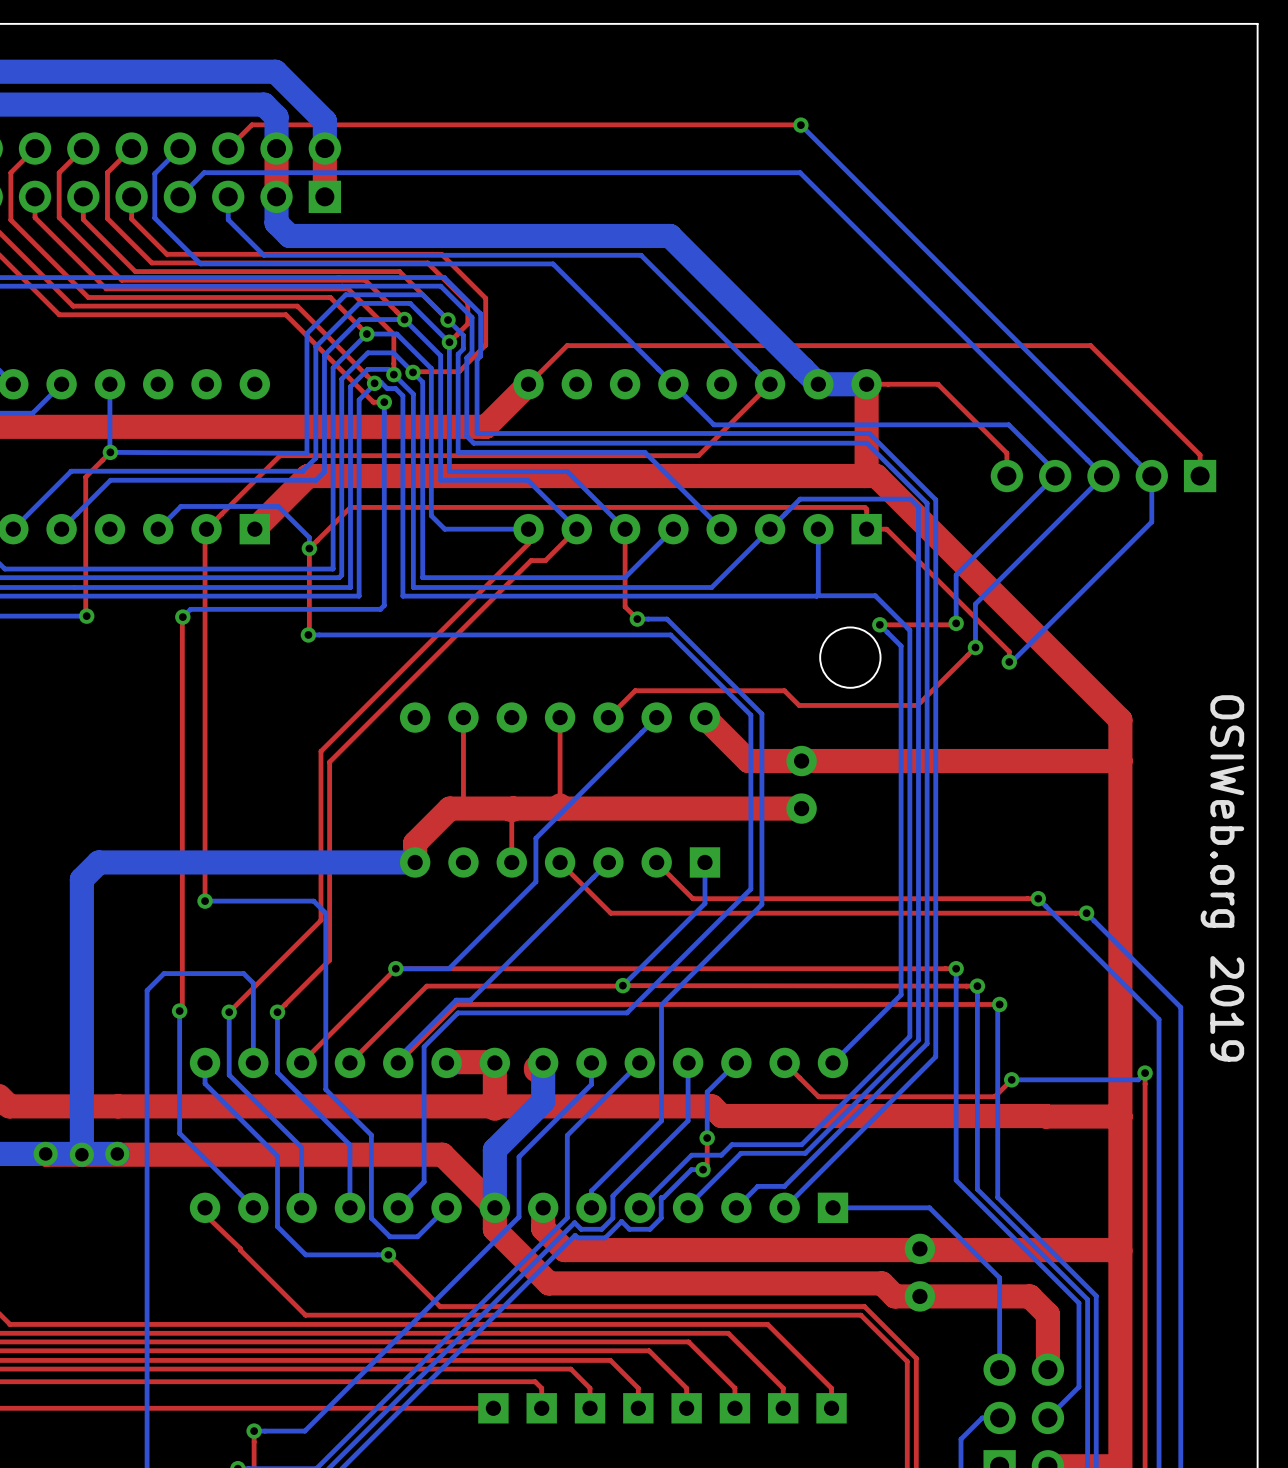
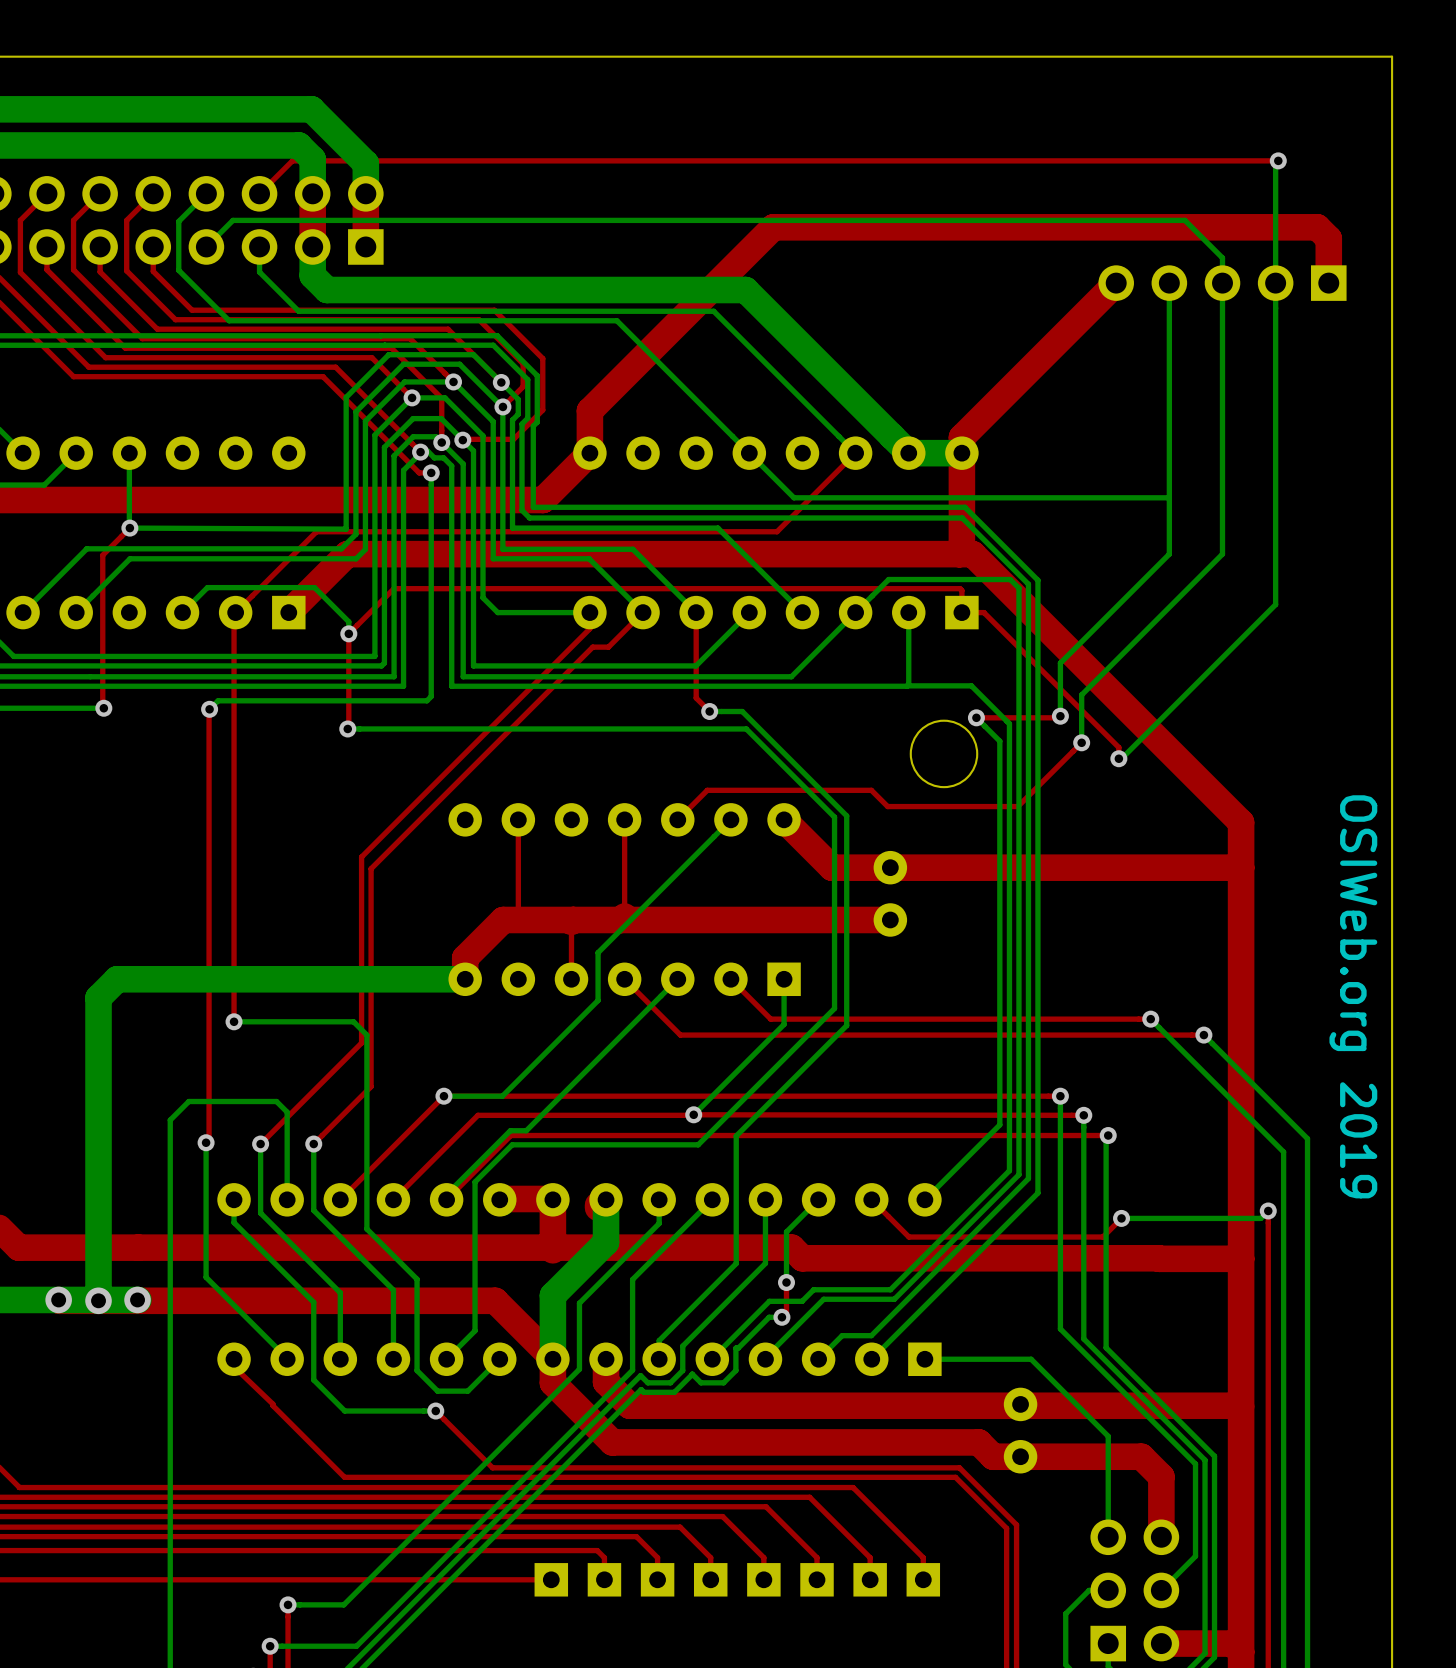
via: none -> (1278, 160)
top track: (800, 124) (251, 124) -> (1278, 160) (292, 160) (285, 167)
bottom track: (800, 125) (1151, 476) -> (1278, 160) (1275, 163) (1275, 554)
via: (800, 125) -> none
bottom track: (800, 172) (1103, 476) -> (888, 220) (1184, 220) (1222, 257) (1222, 554)
bottom track: none -> (1169, 283) (1169, 548)
top track: (528, 384) (567, 345) (1090, 345) (1200, 455) (1200, 476) -> (589, 453) (589, 410) (773, 227) (1317, 227) (1328, 238) (1328, 283)
top track: (866, 384) (937, 384) (1006, 453) (1006, 476) -> (961, 453) (961, 437) (1116, 283)
bottom track: (1008, 424) (1055, 471) -> (1118, 497) (1168, 497)
part position: (1103, 476) -> (1222, 283)

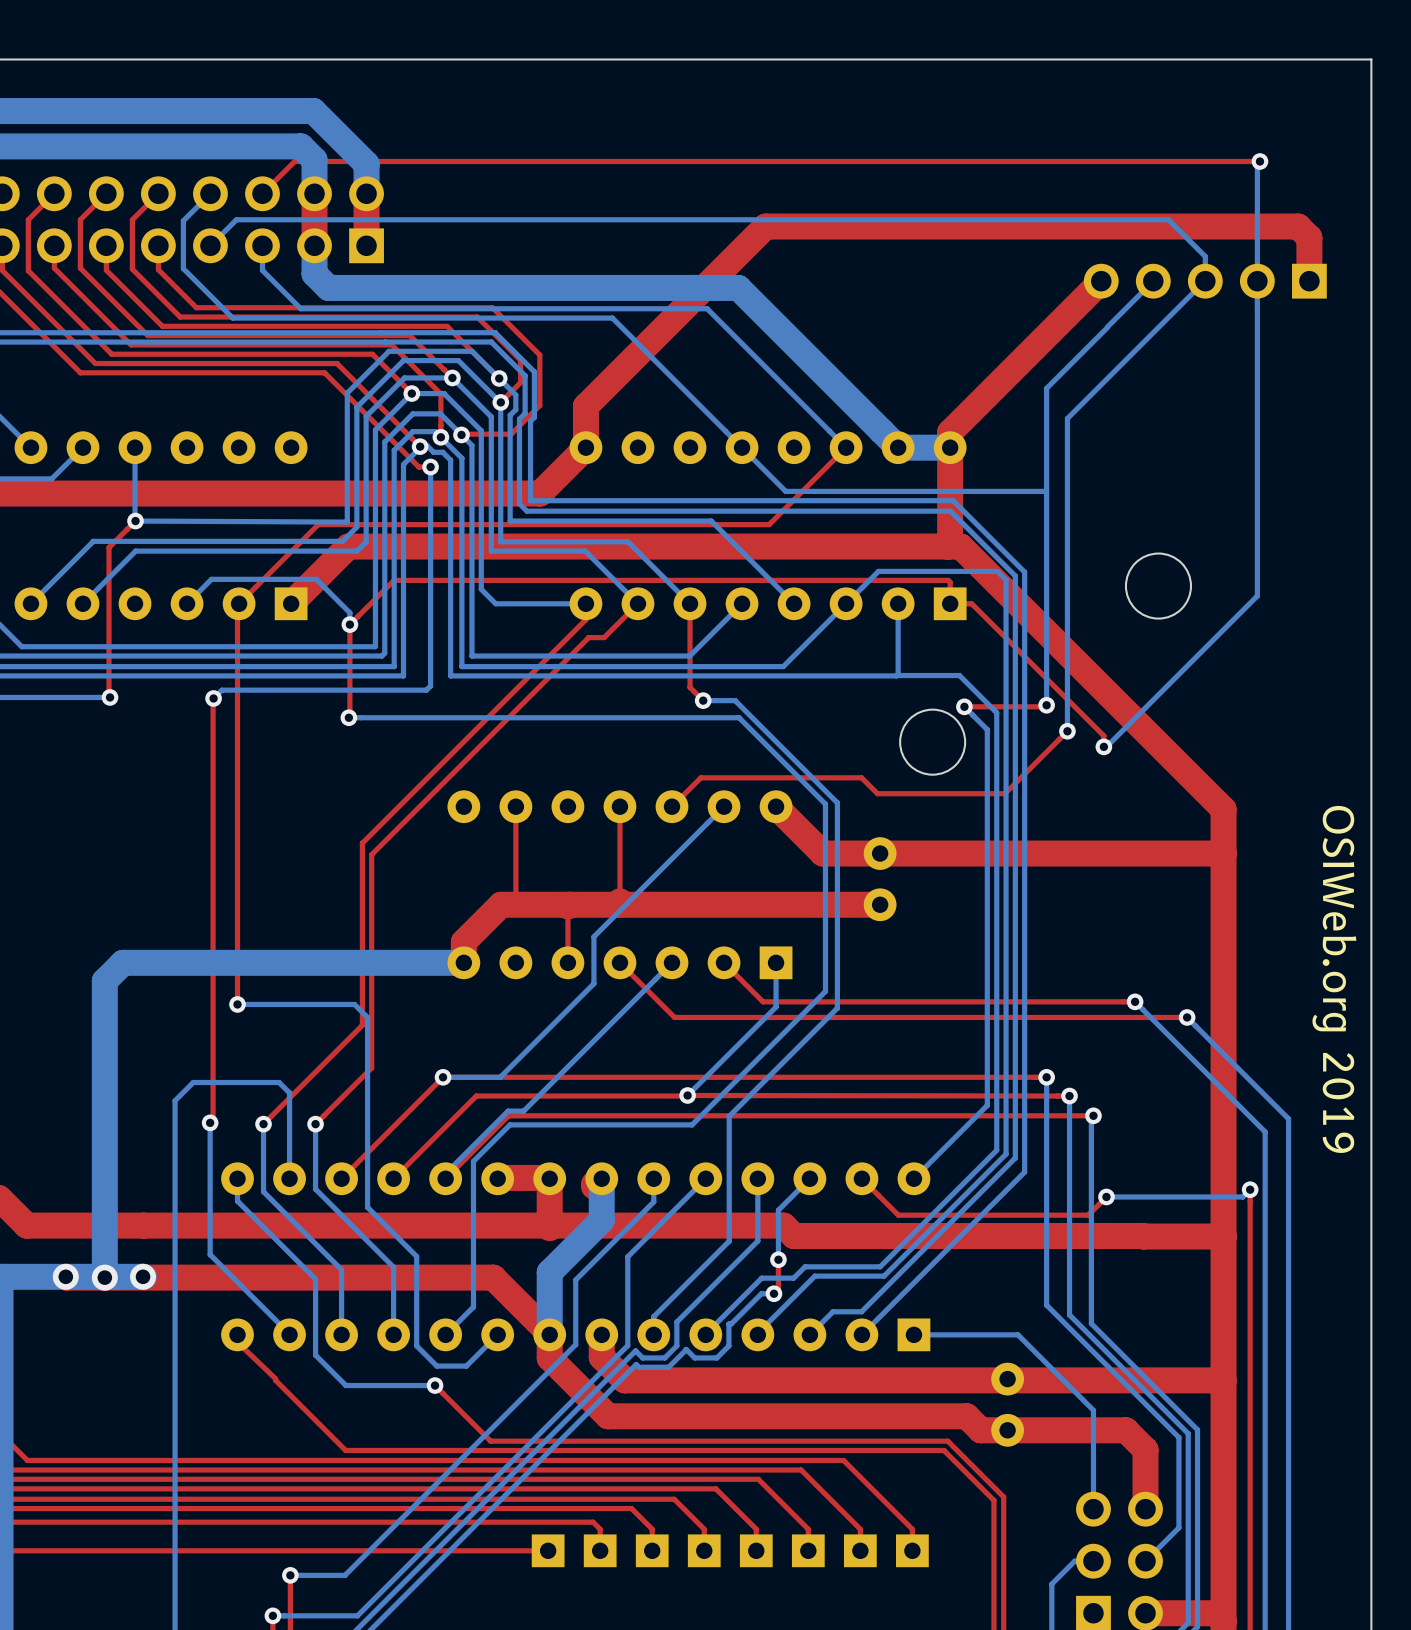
bottom track: (1169, 283) (1169, 554) (1060, 663) -> (1106, 328) (1046, 388) (1046, 653)
bottom track: none -> (1153, 281) (1107, 326)
bottom track: (1222, 283) (1222, 554) (1081, 694) -> (1205, 281) (1067, 418) (1067, 684)
bottom track: (1168, 497) (1060, 497) -> none
round board edge: none -> [1124, 552, 1193, 620]

